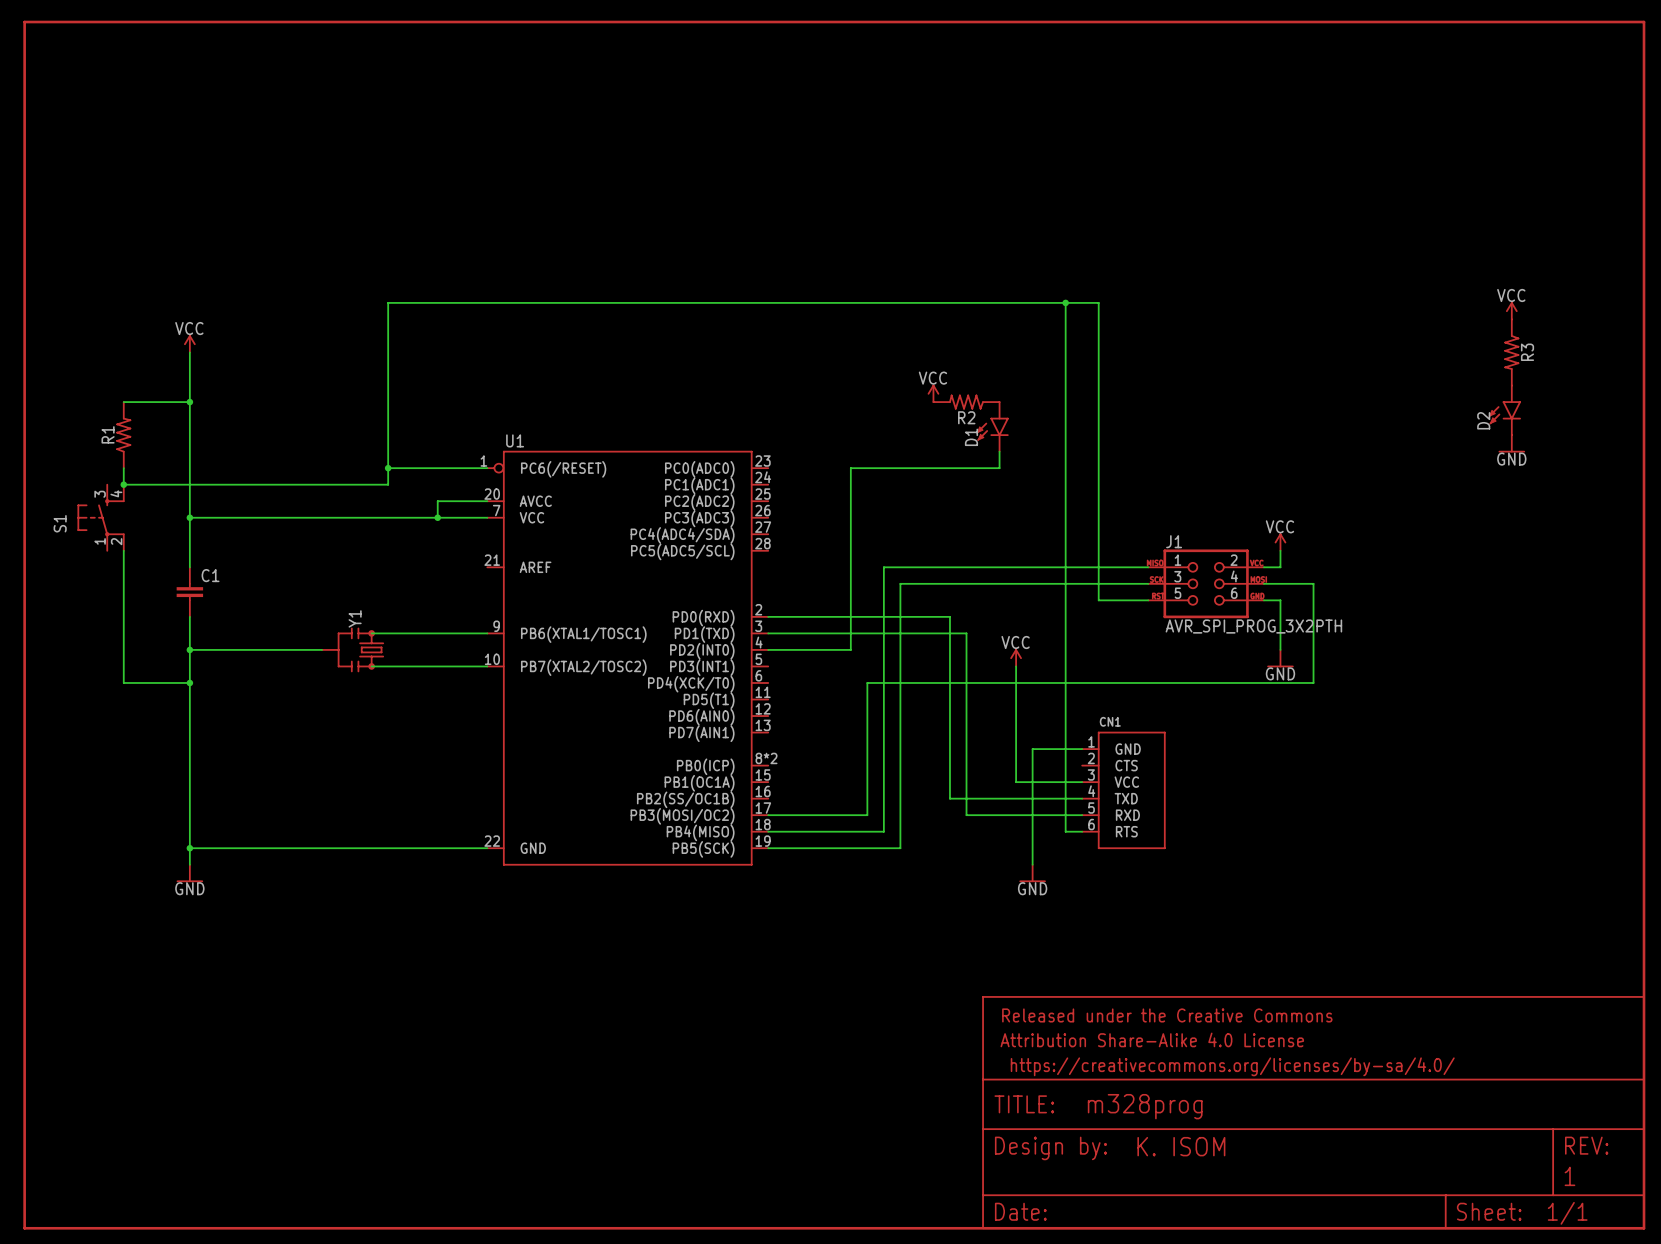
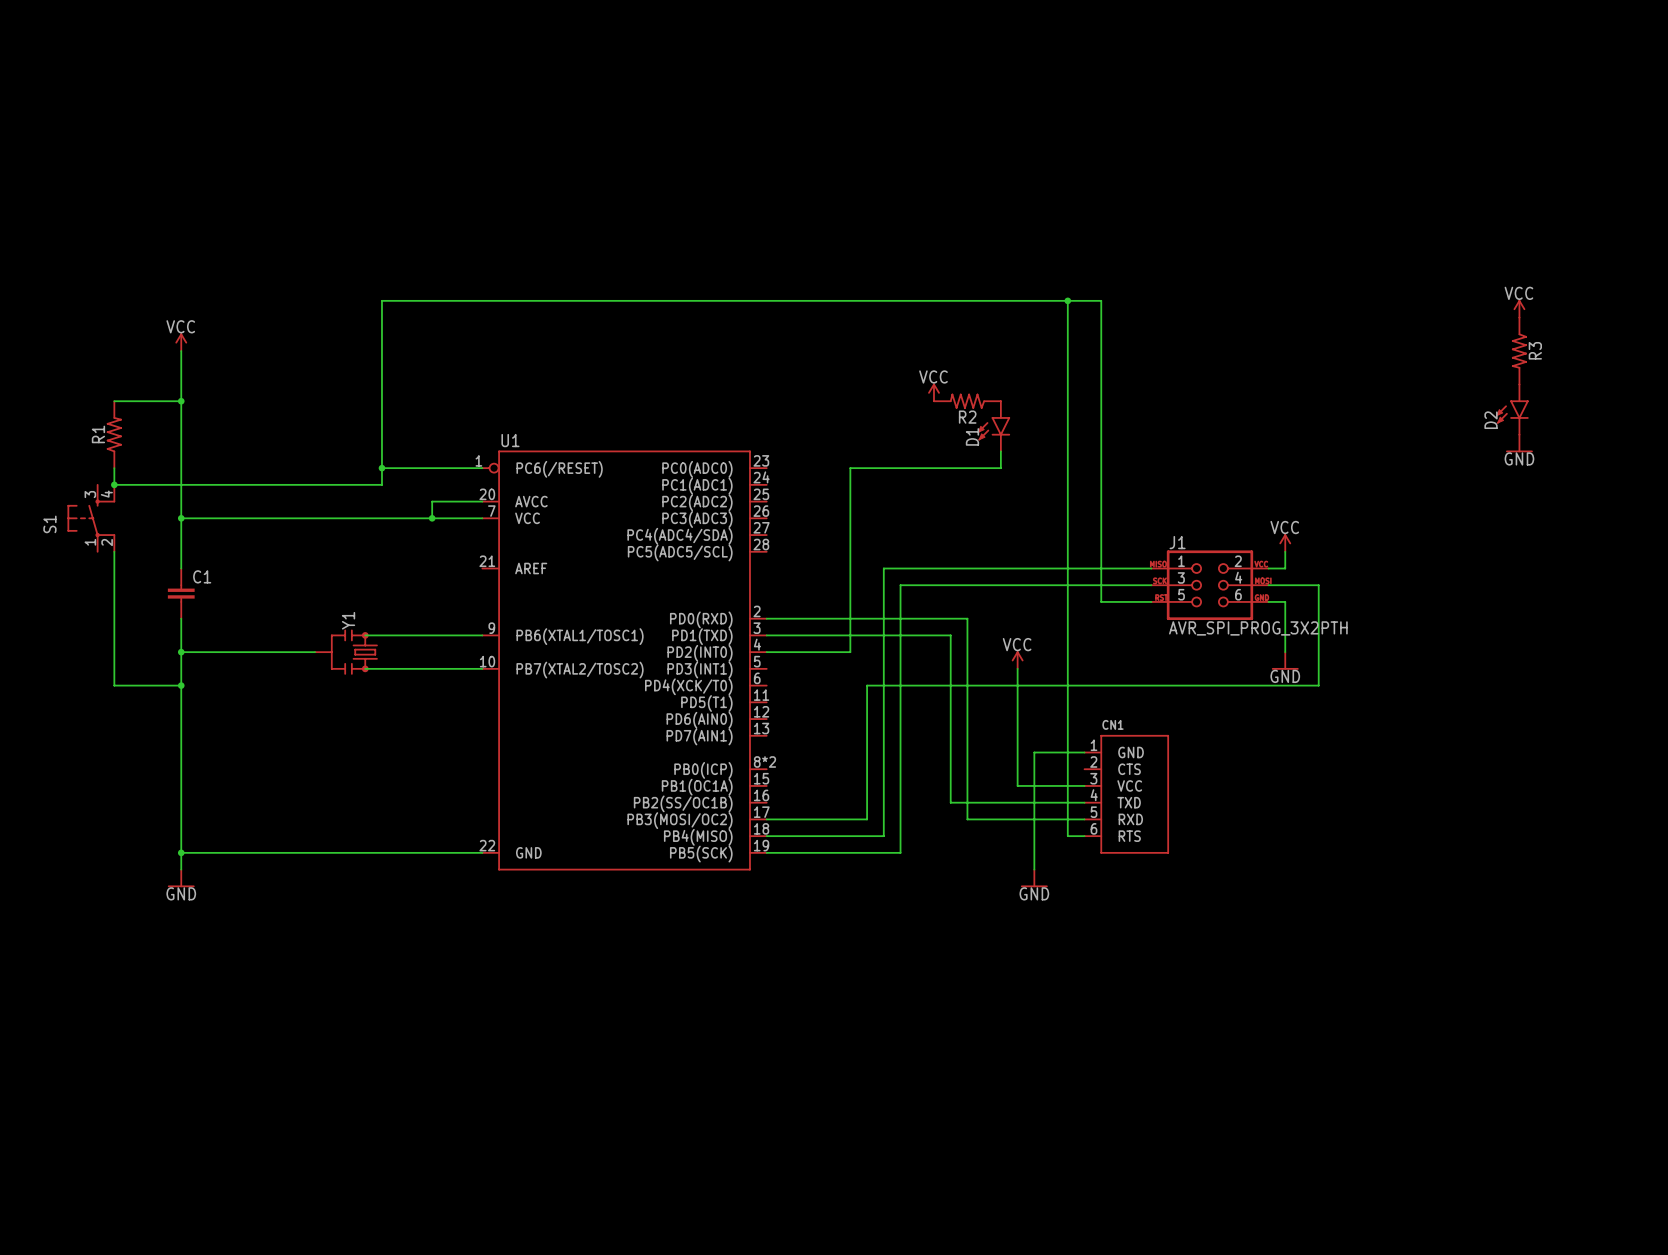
wire: (949, 616) (949, 633) (966, 633) -> (950, 618) (967, 618) (967, 635)
part: (834, 625) -> none
part: (1313, 1112) -> none

